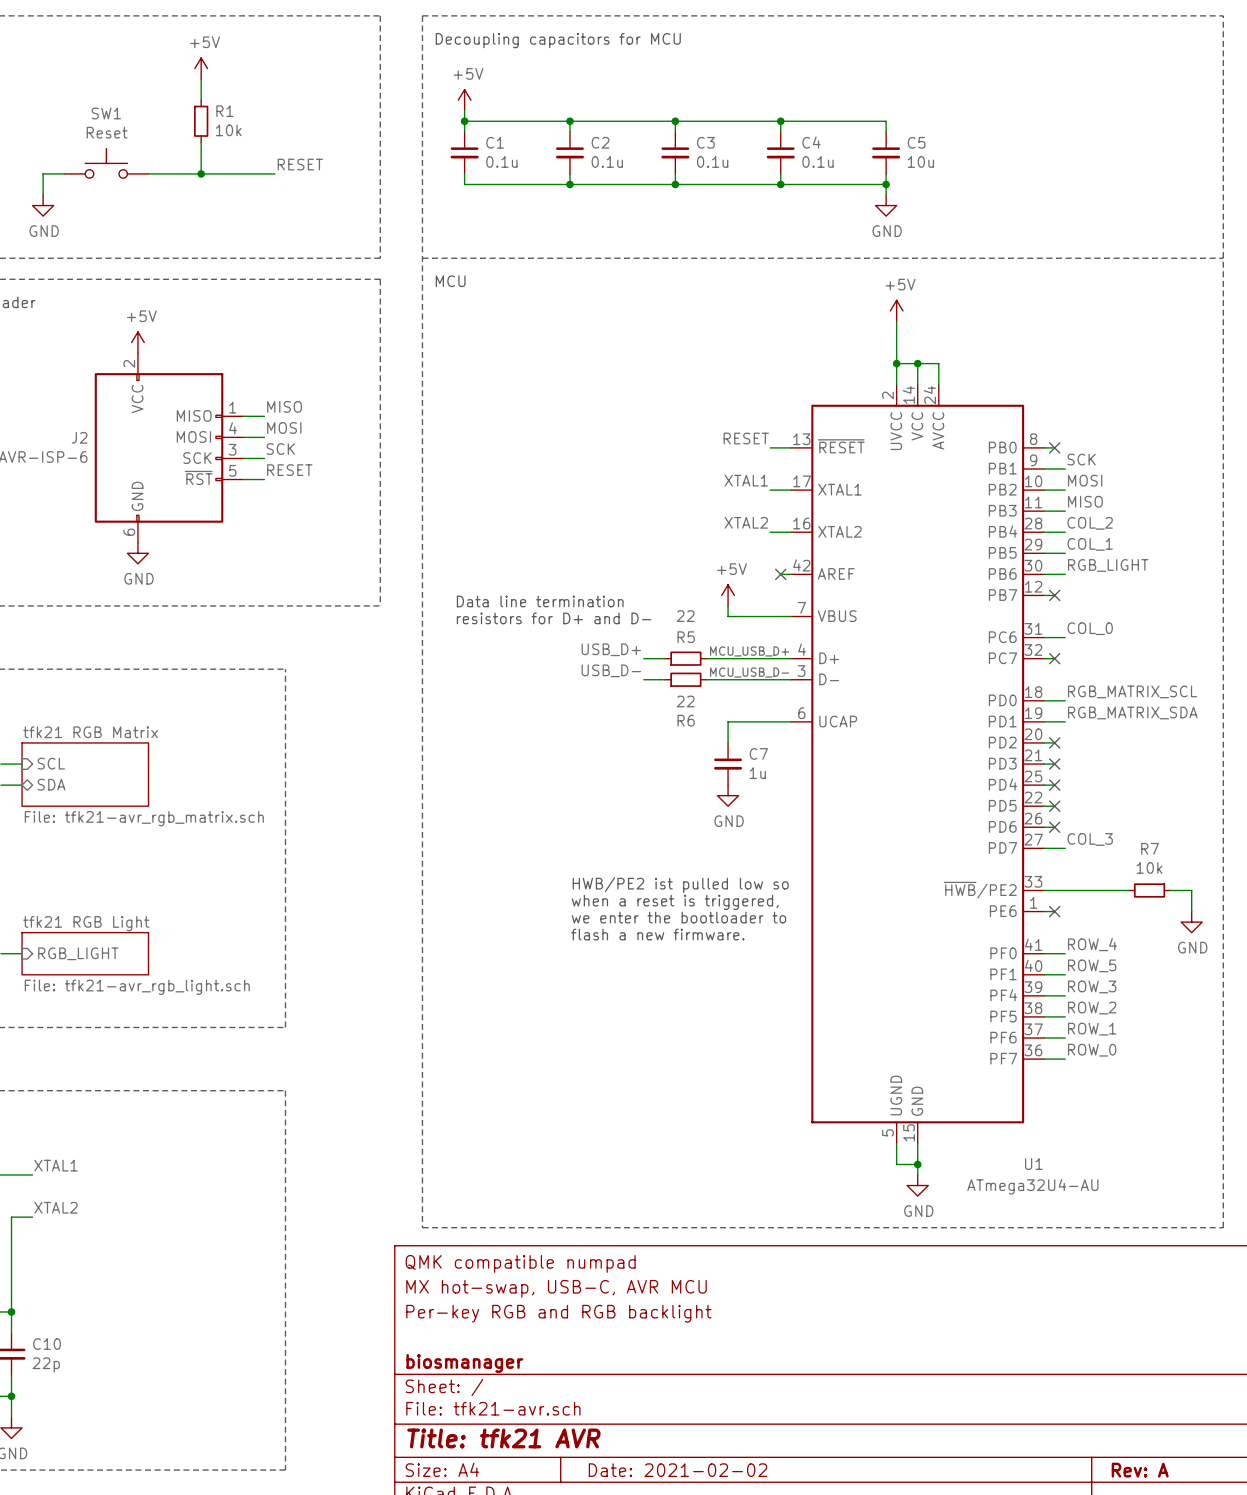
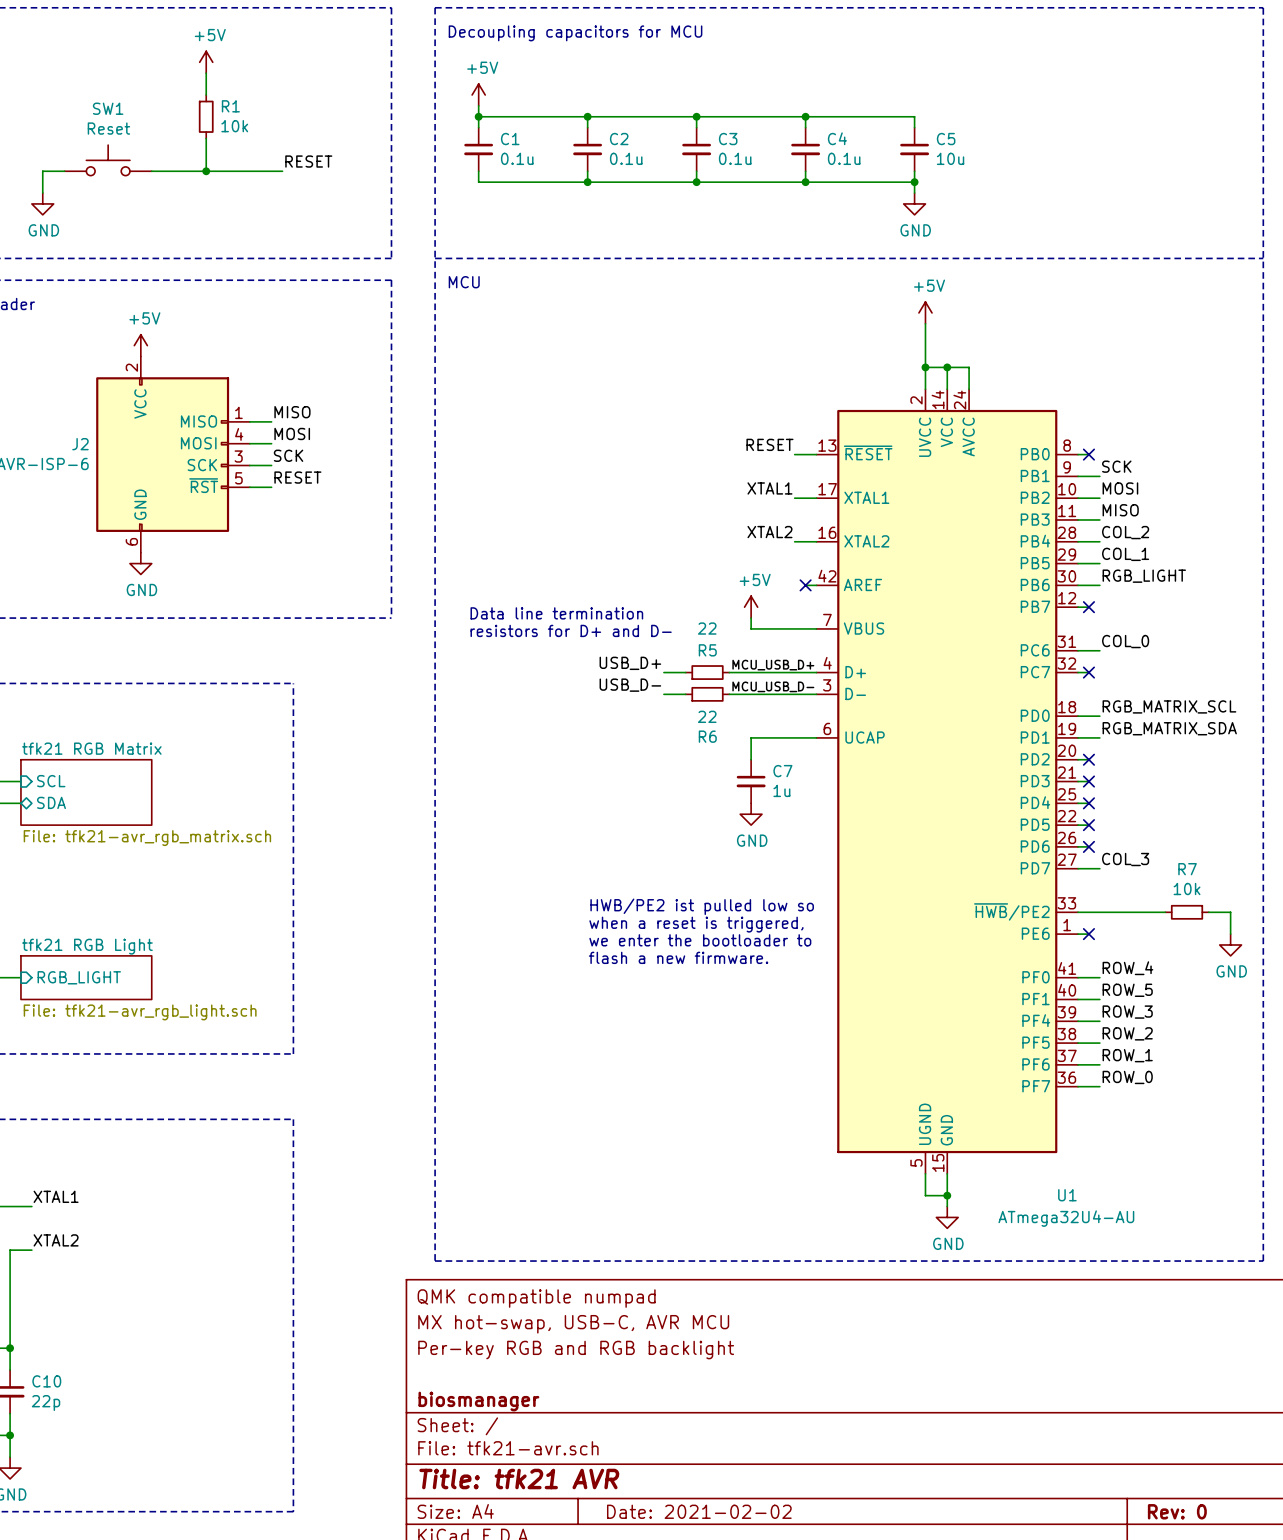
title block: Rev: A (1140, 1470) -> Rev: 0 (1177, 1511)

